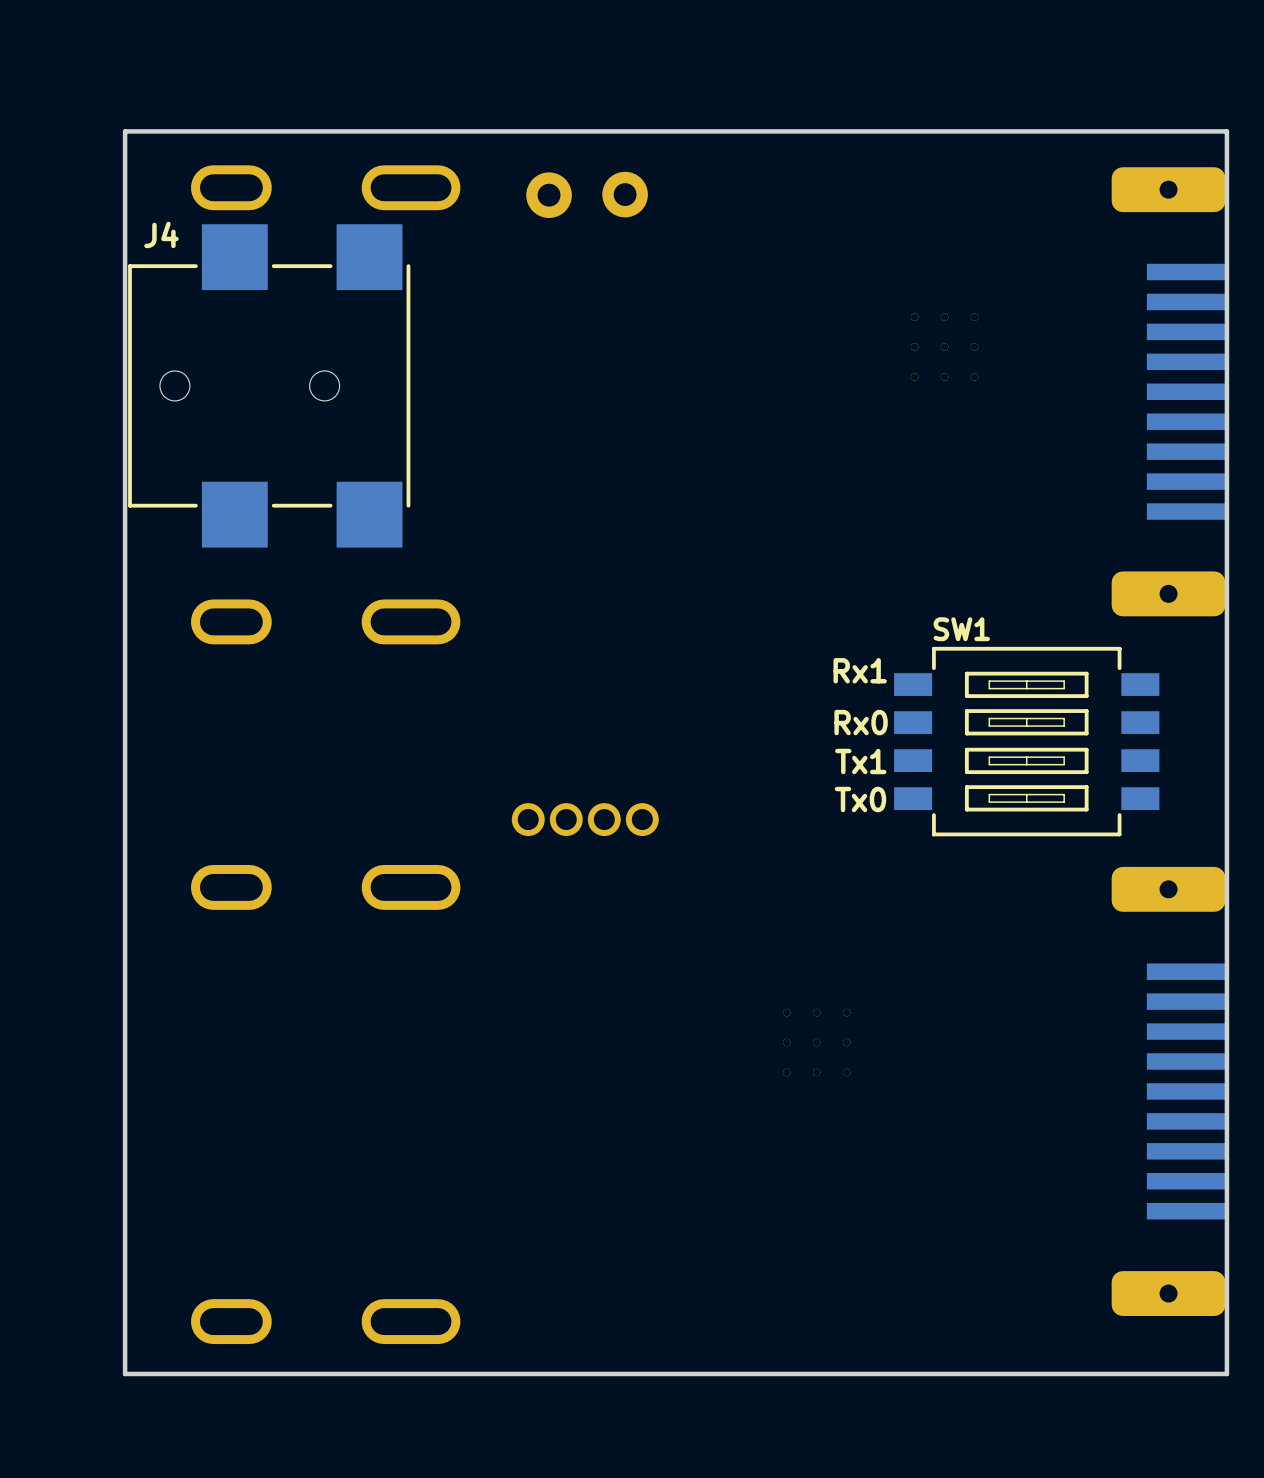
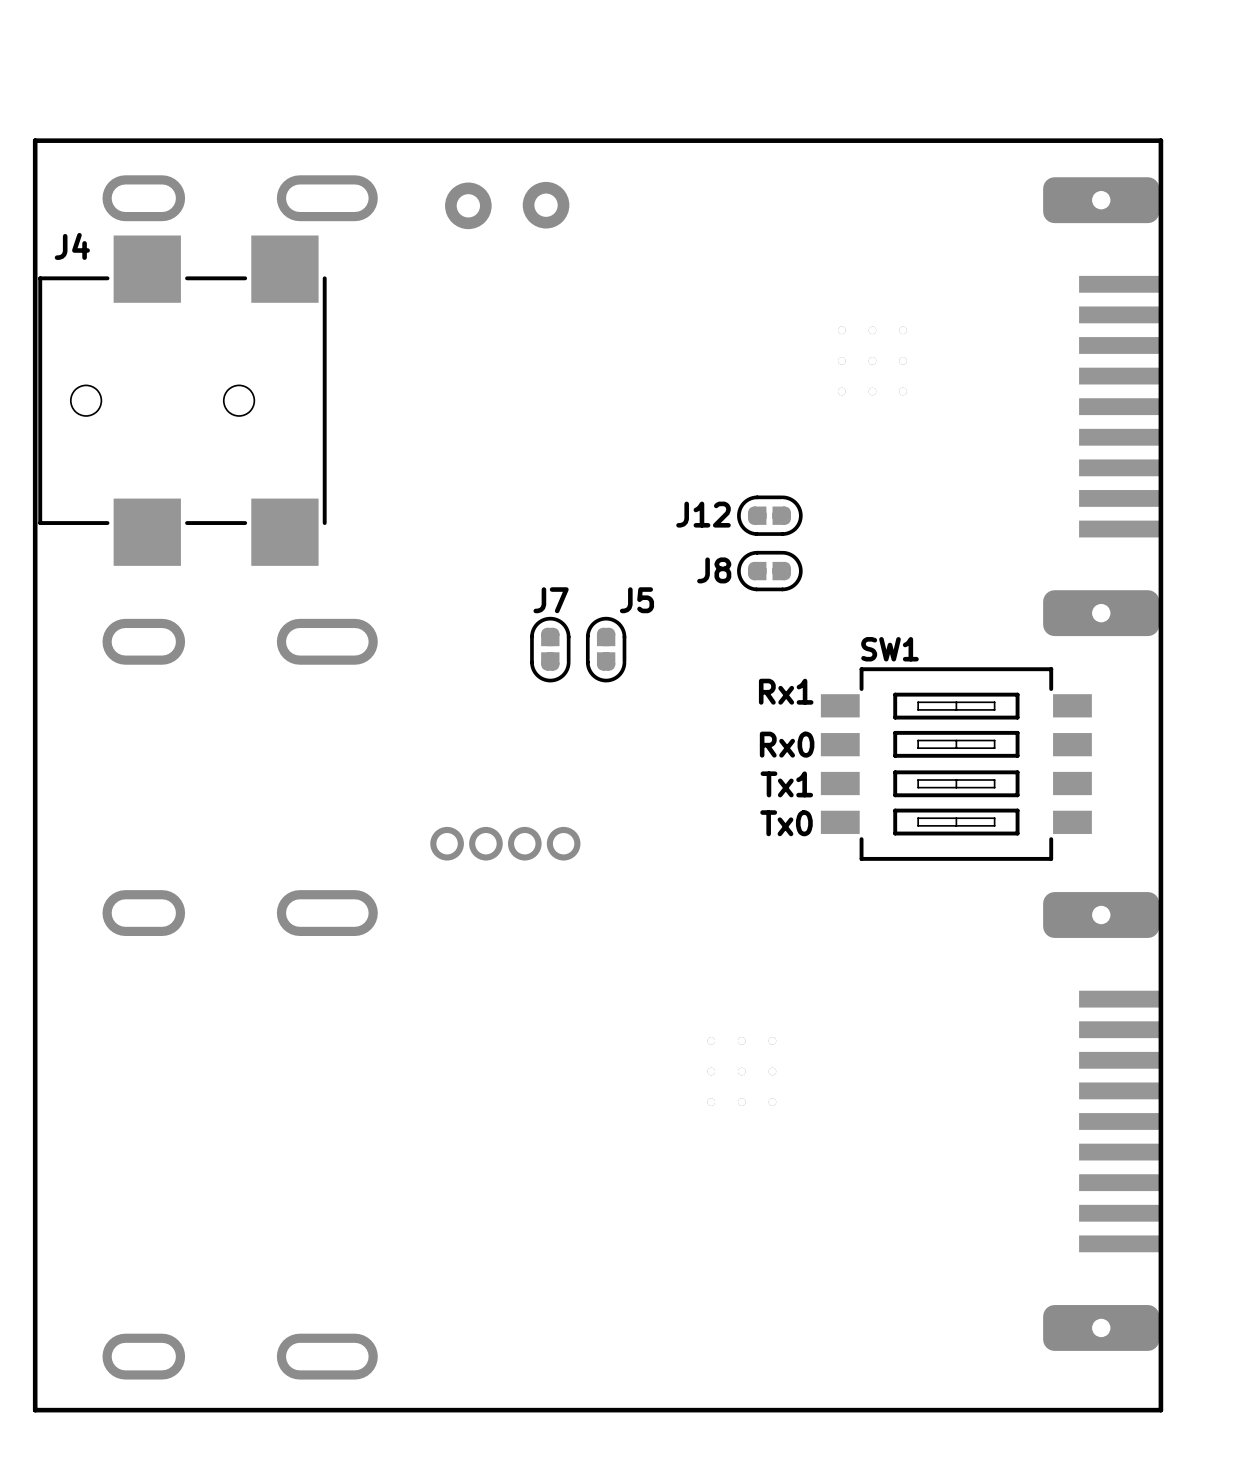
J12: none -> (769, 515)
J8: none -> (769, 571)
J7: none -> (550, 649)
J5: none -> (606, 649)

